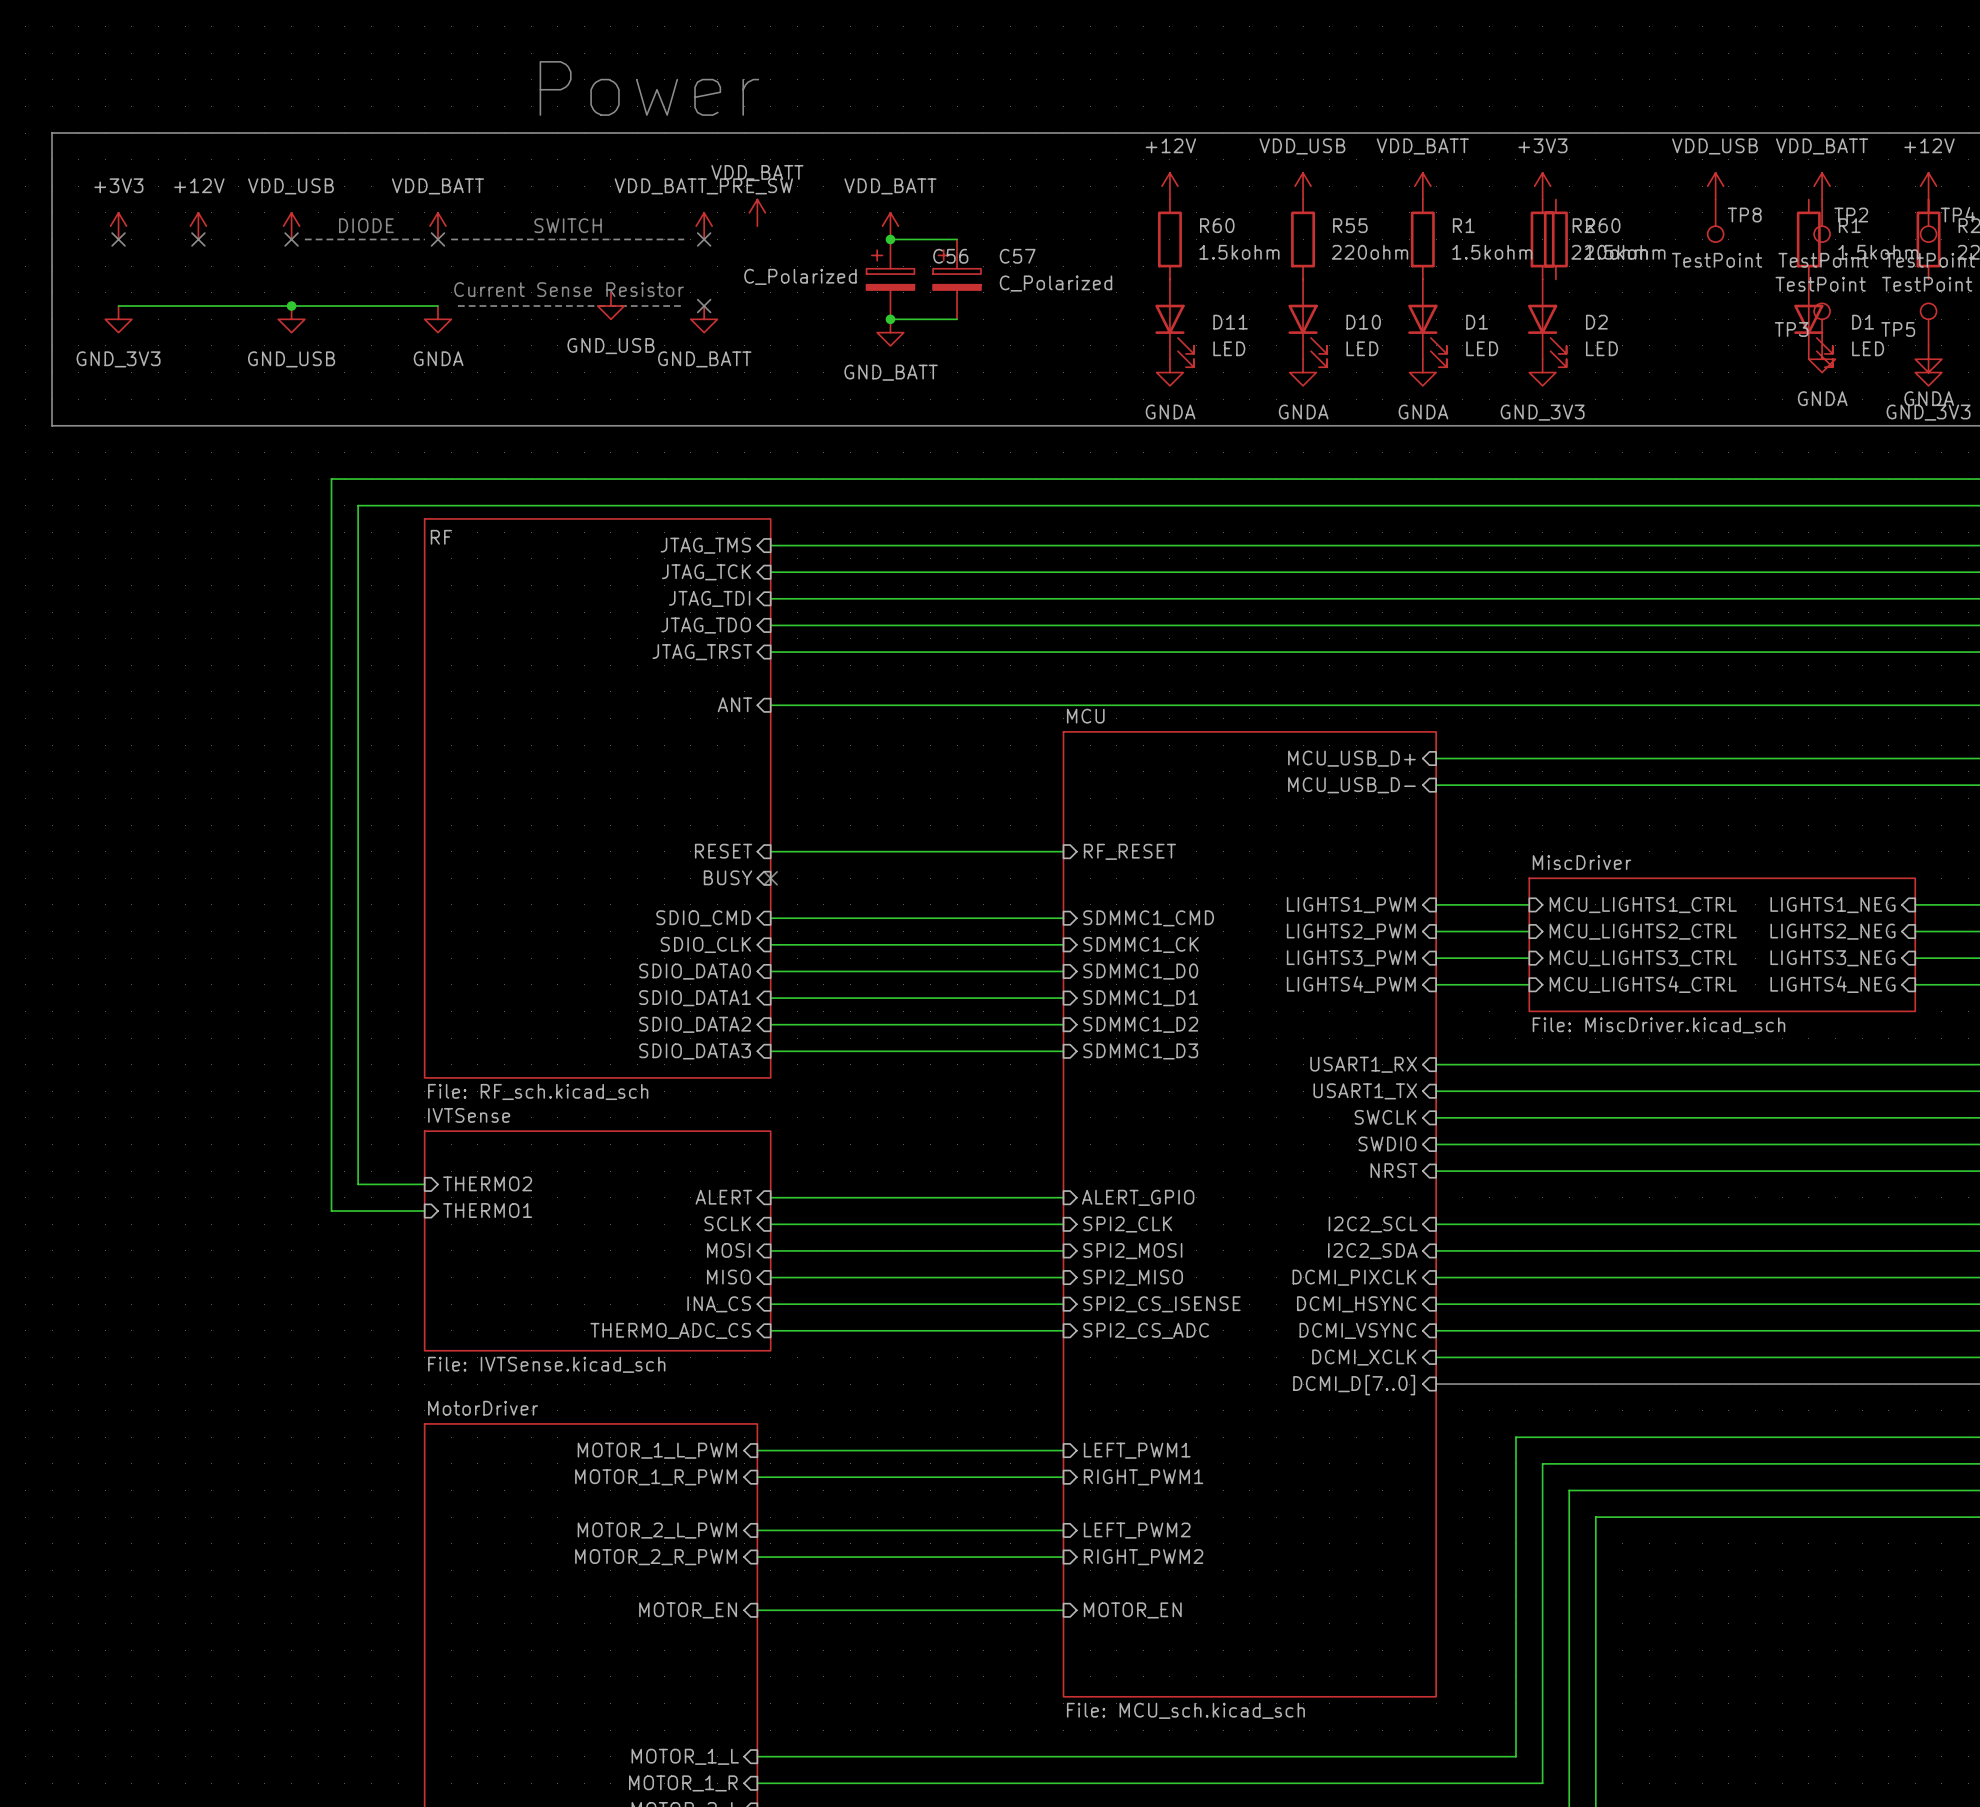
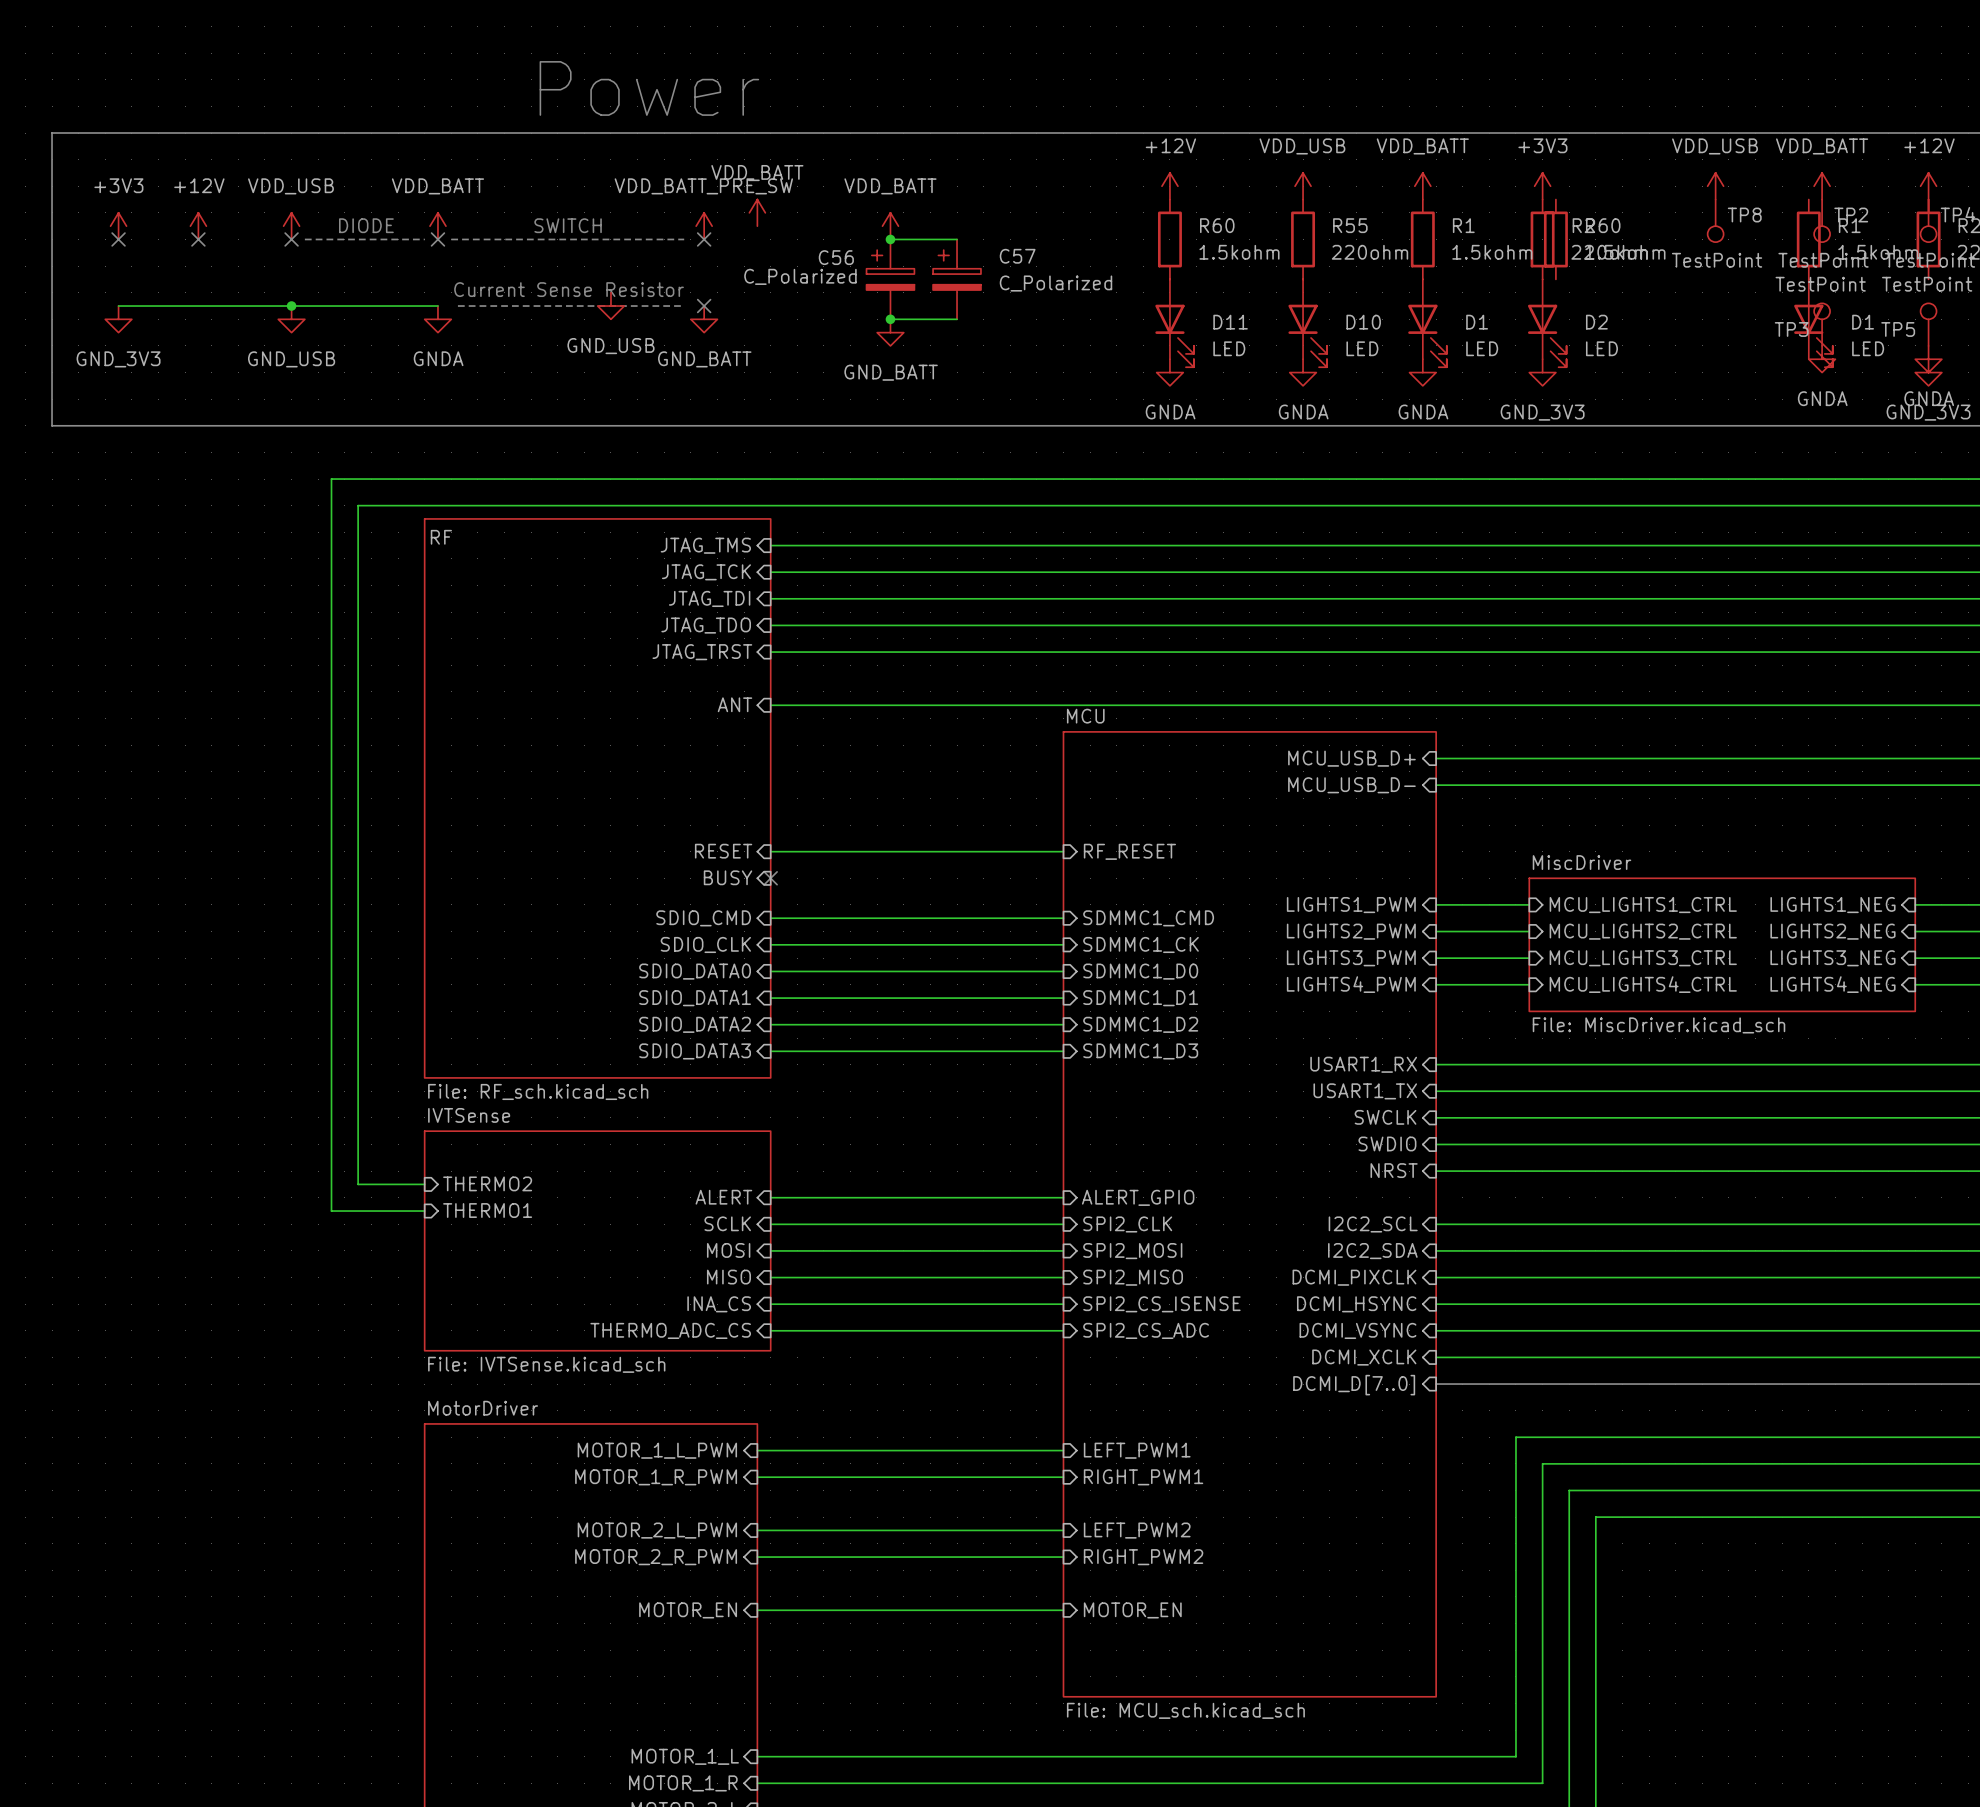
C56 name position: C56 (950, 256) -> C56 (836, 257)

